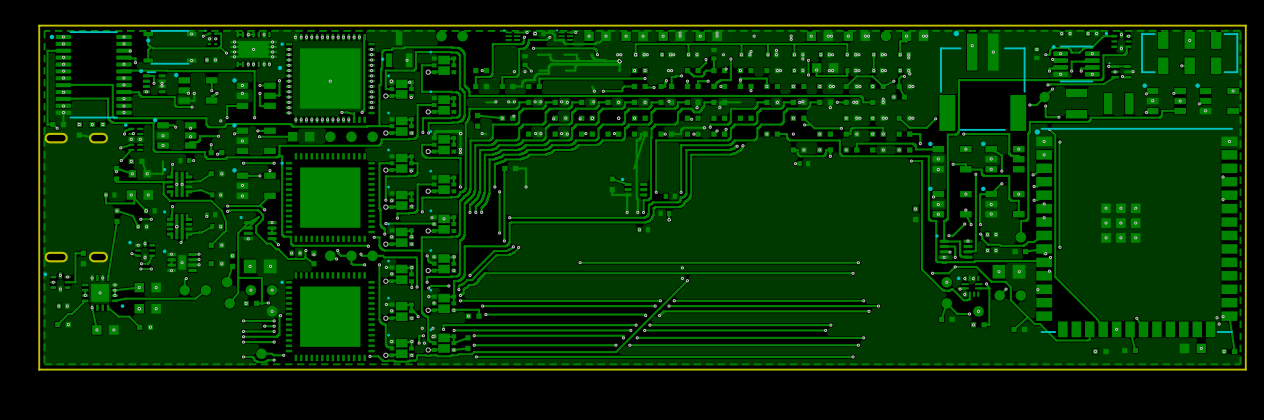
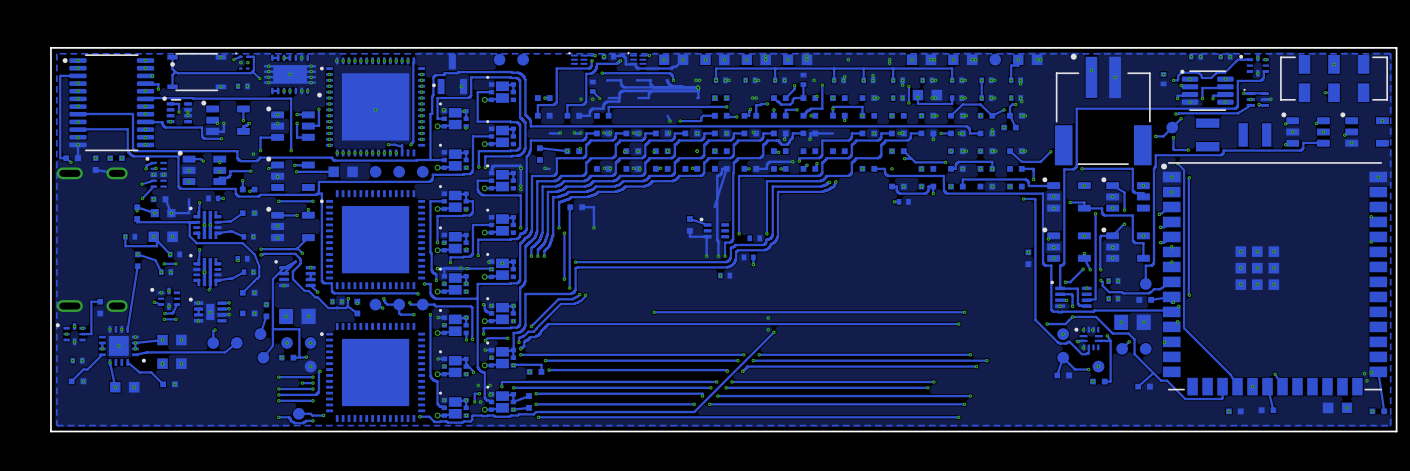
track: none -> (460, 268) (444, 268) (444, 276)
via: none -> (460, 268)
via: none -> (467, 268)

